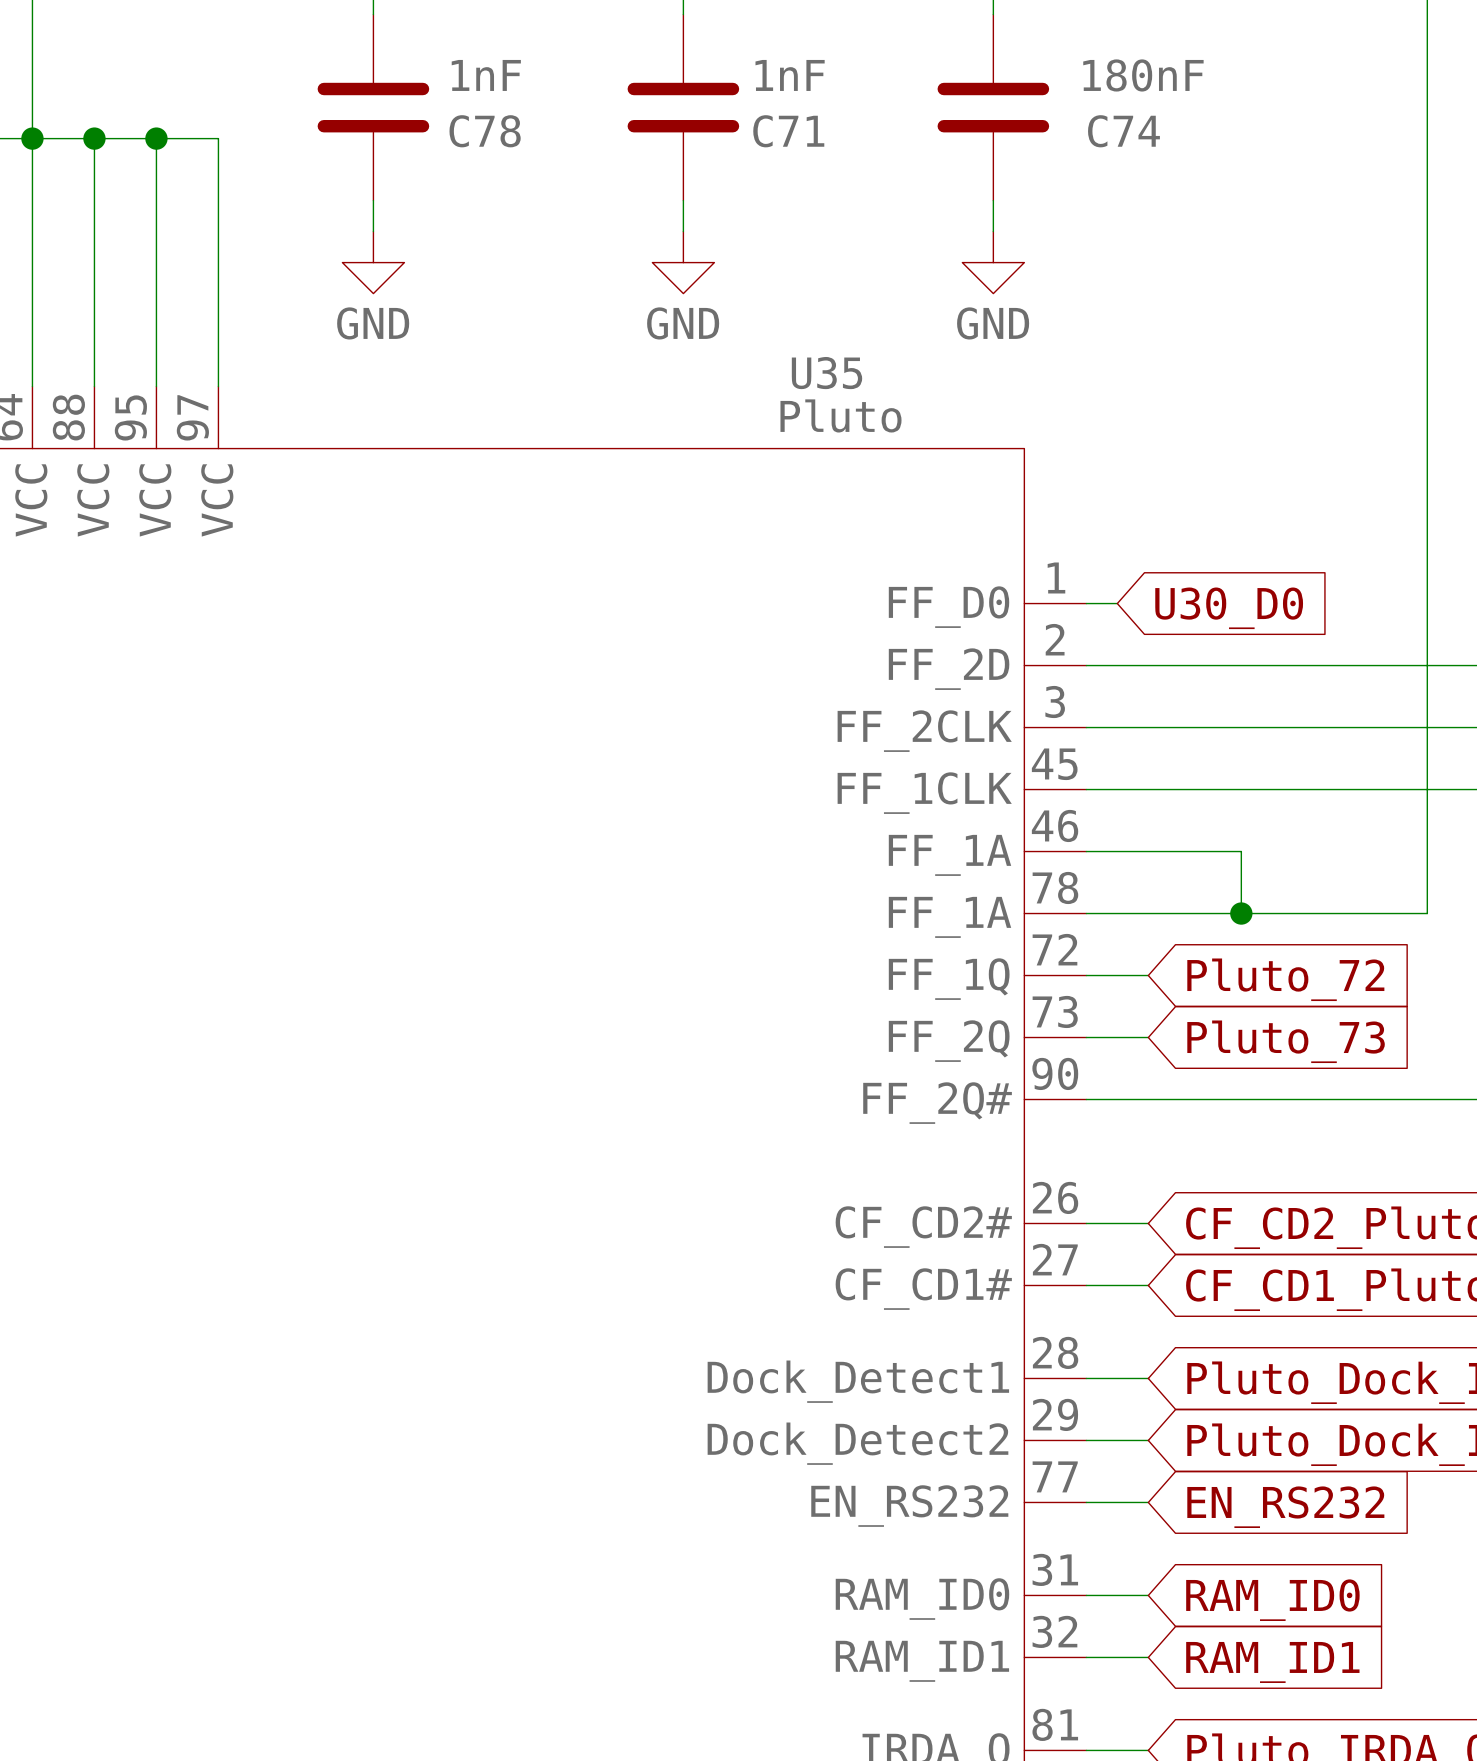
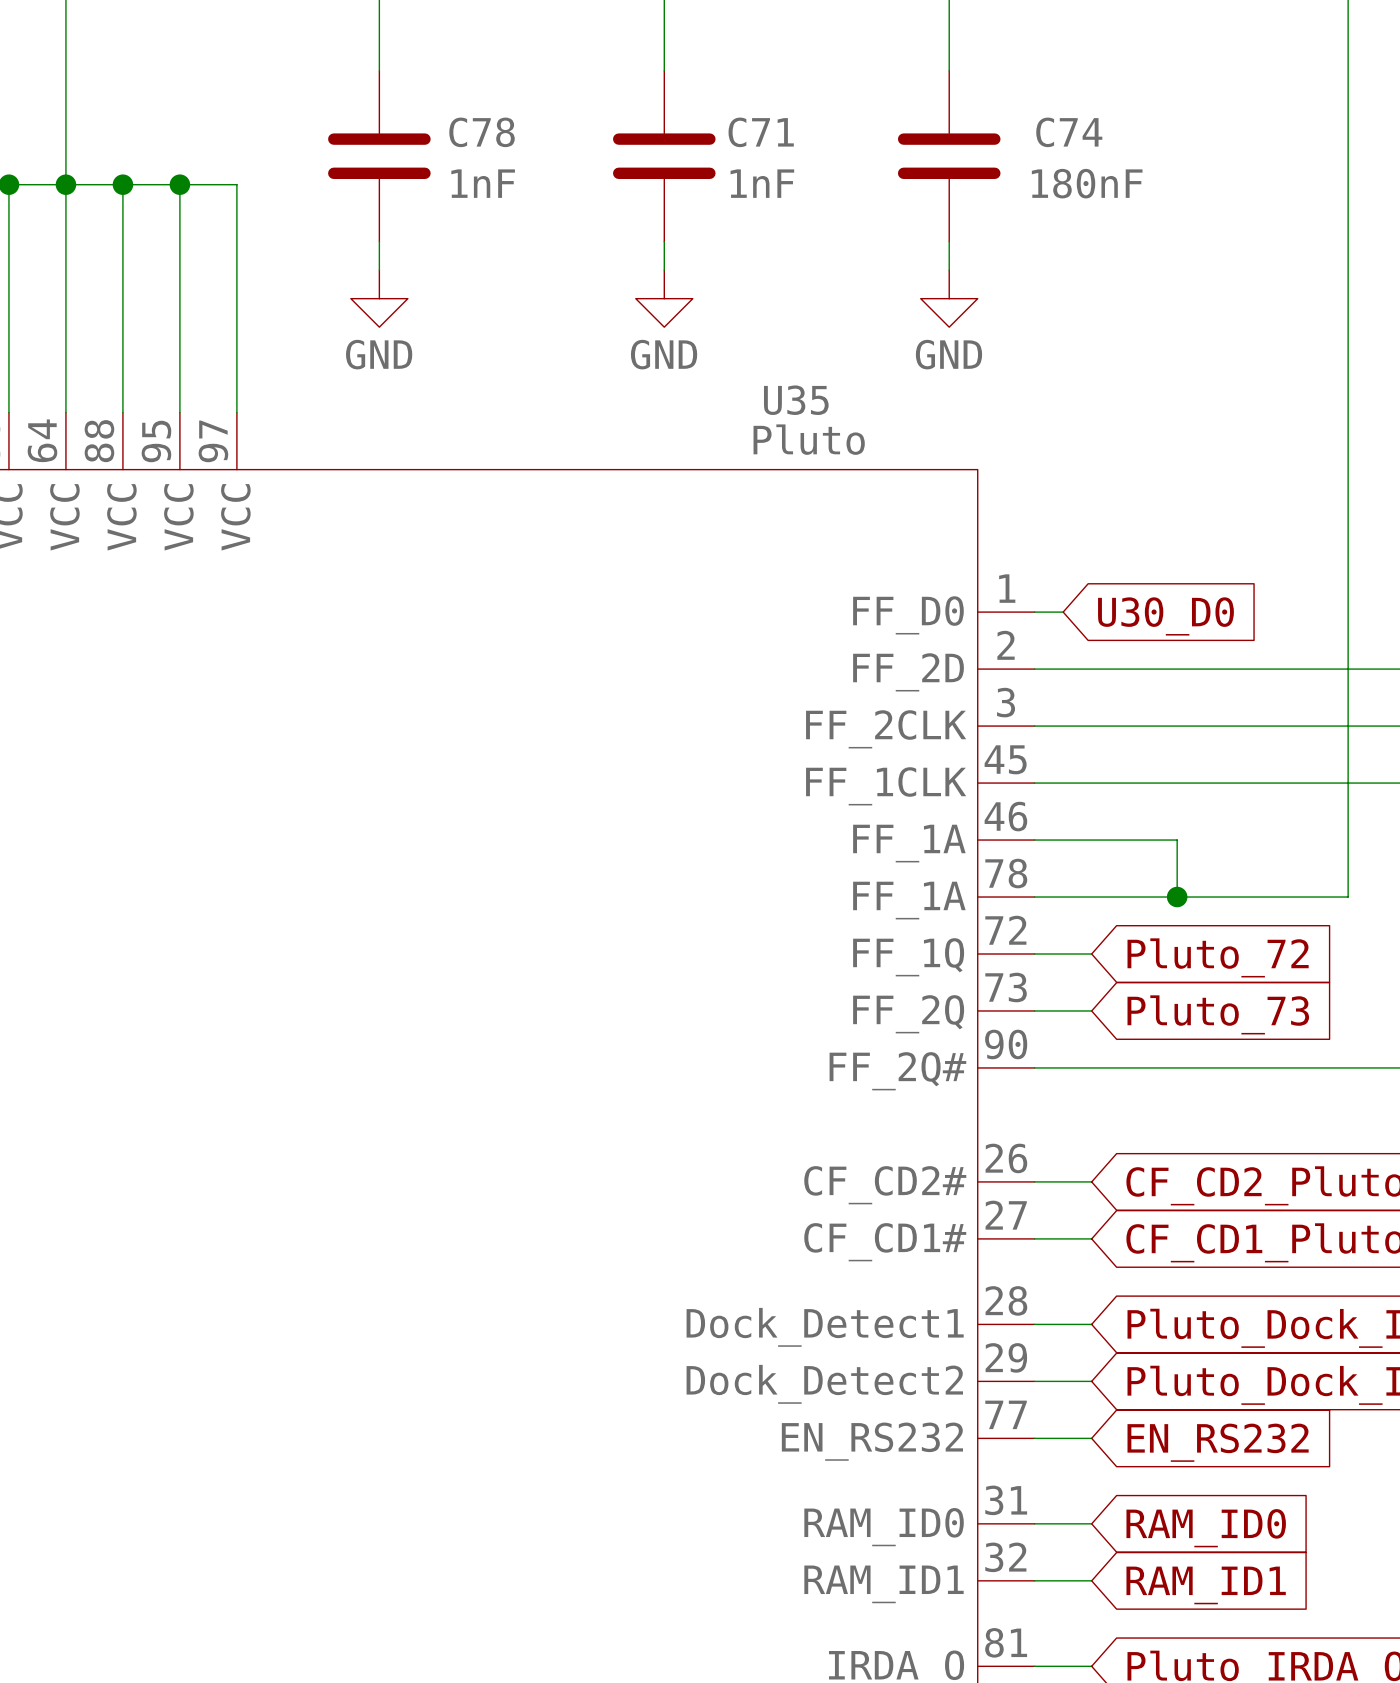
C78 value position: 1nF (486, 75) -> 1nF (483, 183)
C71 value position: 1nF (790, 75) -> 1nF (762, 183)
C74 value position: 180nF (1143, 75) -> 180nF (1087, 183)
C78 name position: C78 (485, 131) -> C78 (482, 132)
C71 name position: C71 (788, 131) -> C71 (761, 132)
C74 name position: C74 (1123, 131) -> C74 (1069, 132)

